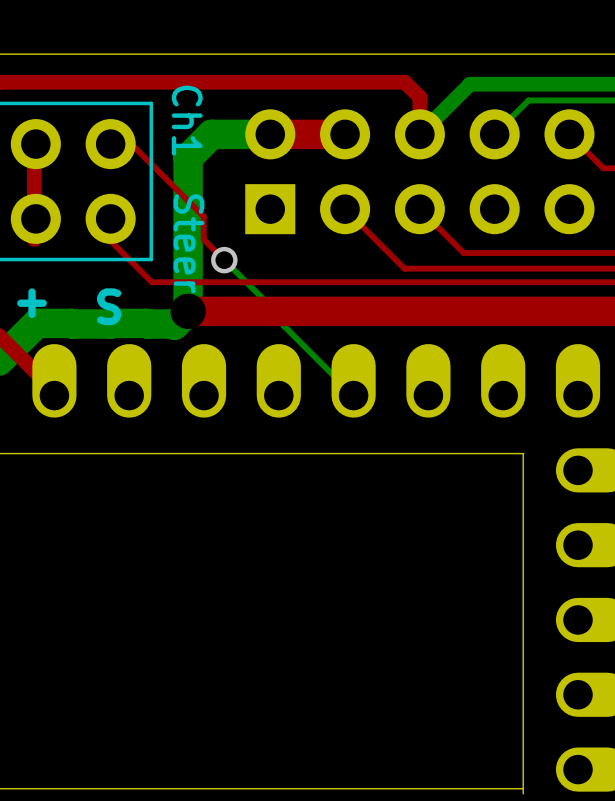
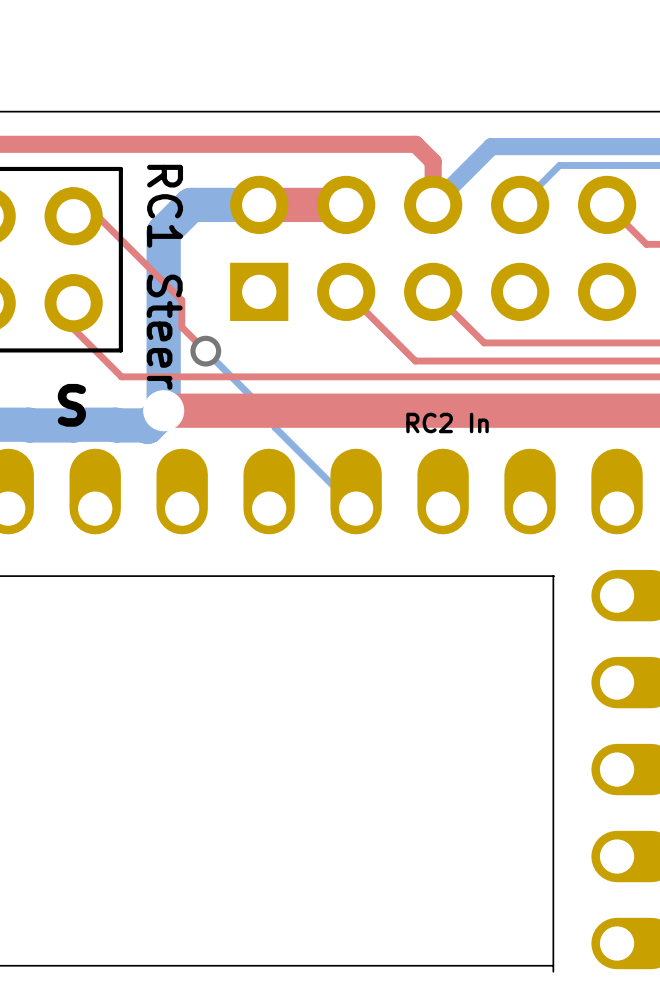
text: Ch1 (187, 120) -> RC1 (165, 206)
text: none -> RC2 In (447, 423)

